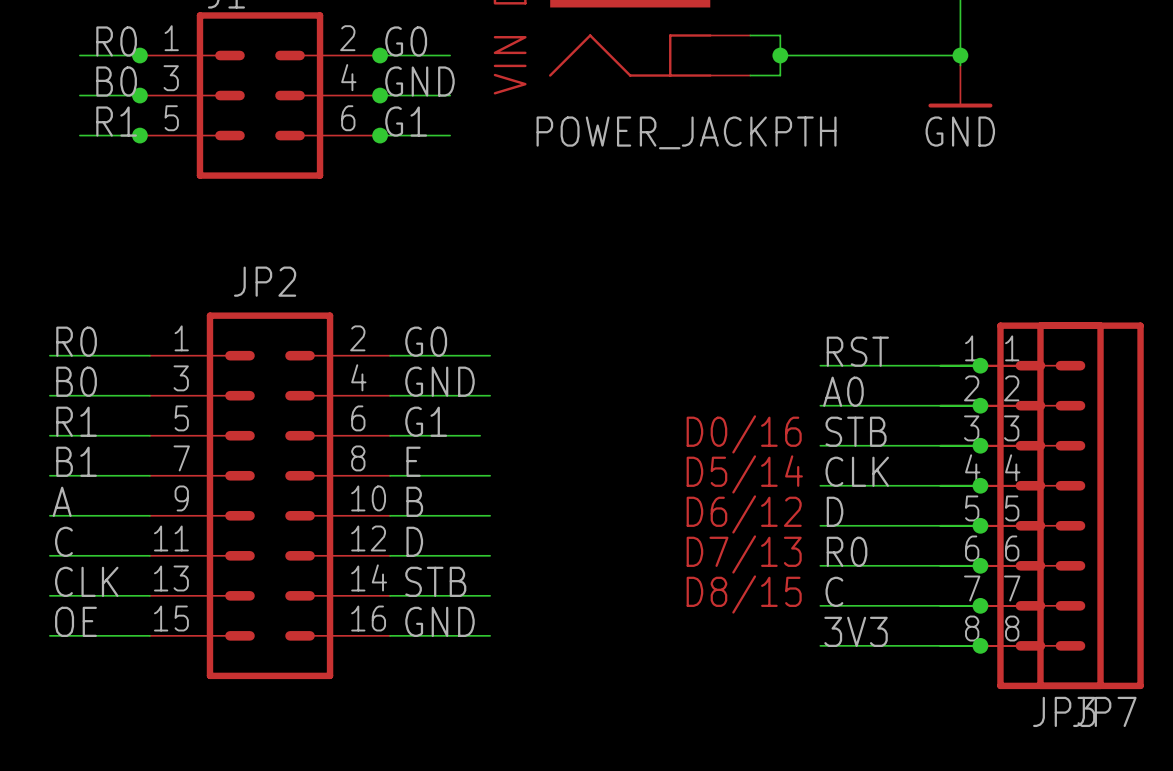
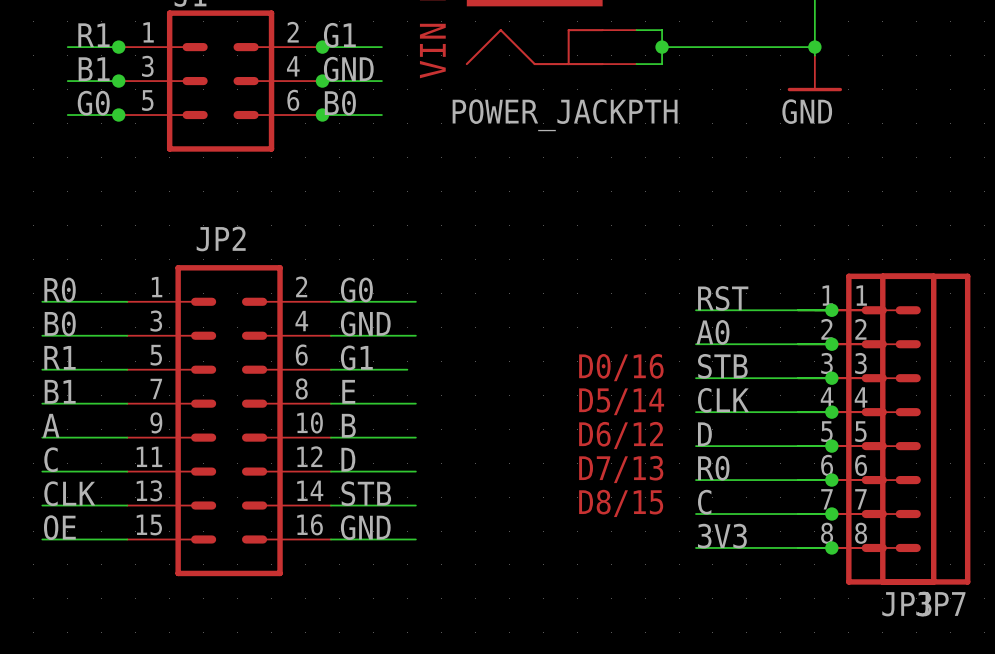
label: R0 (116, 41) -> R1 (93, 35)
label: G0 (406, 41) -> G1 (339, 35)
label: B0 (116, 81) -> B1 (94, 69)
label: R1 (116, 121) -> G0 (93, 103)
label: G1 (406, 121) -> B0 (340, 103)

